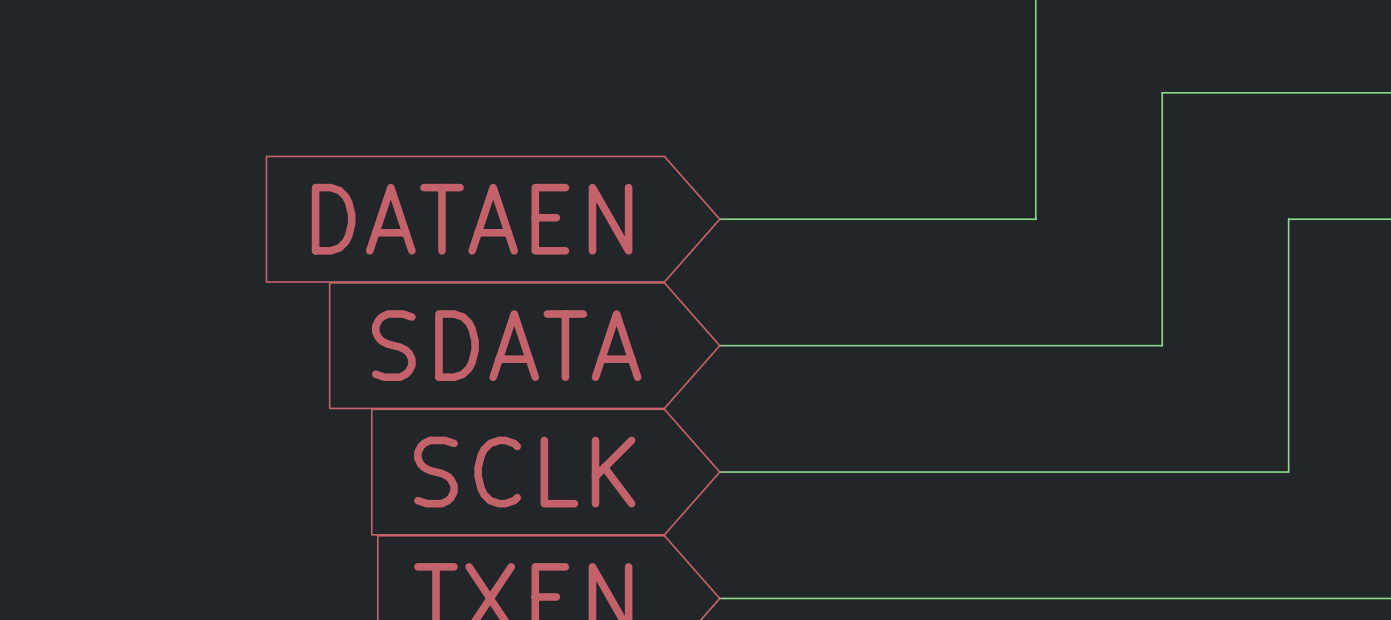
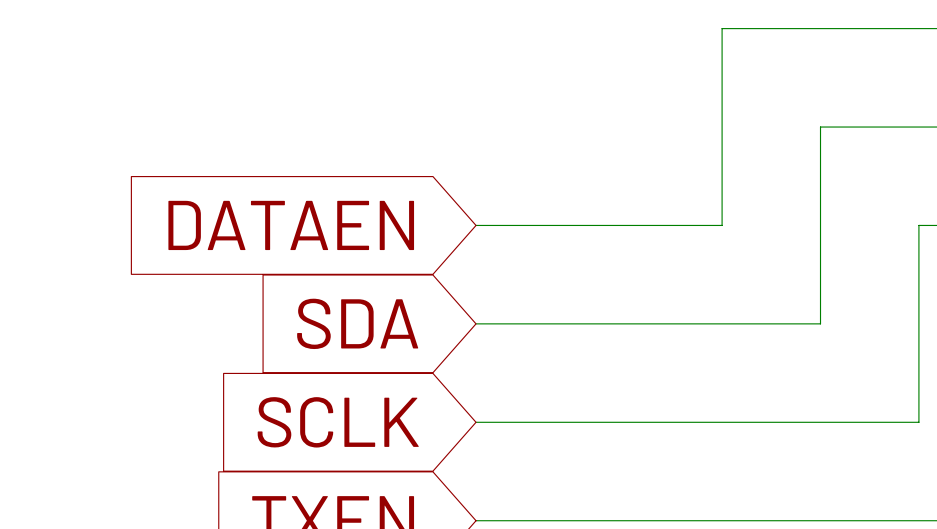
global label: SDATA (506, 345) -> SDA (357, 323)

